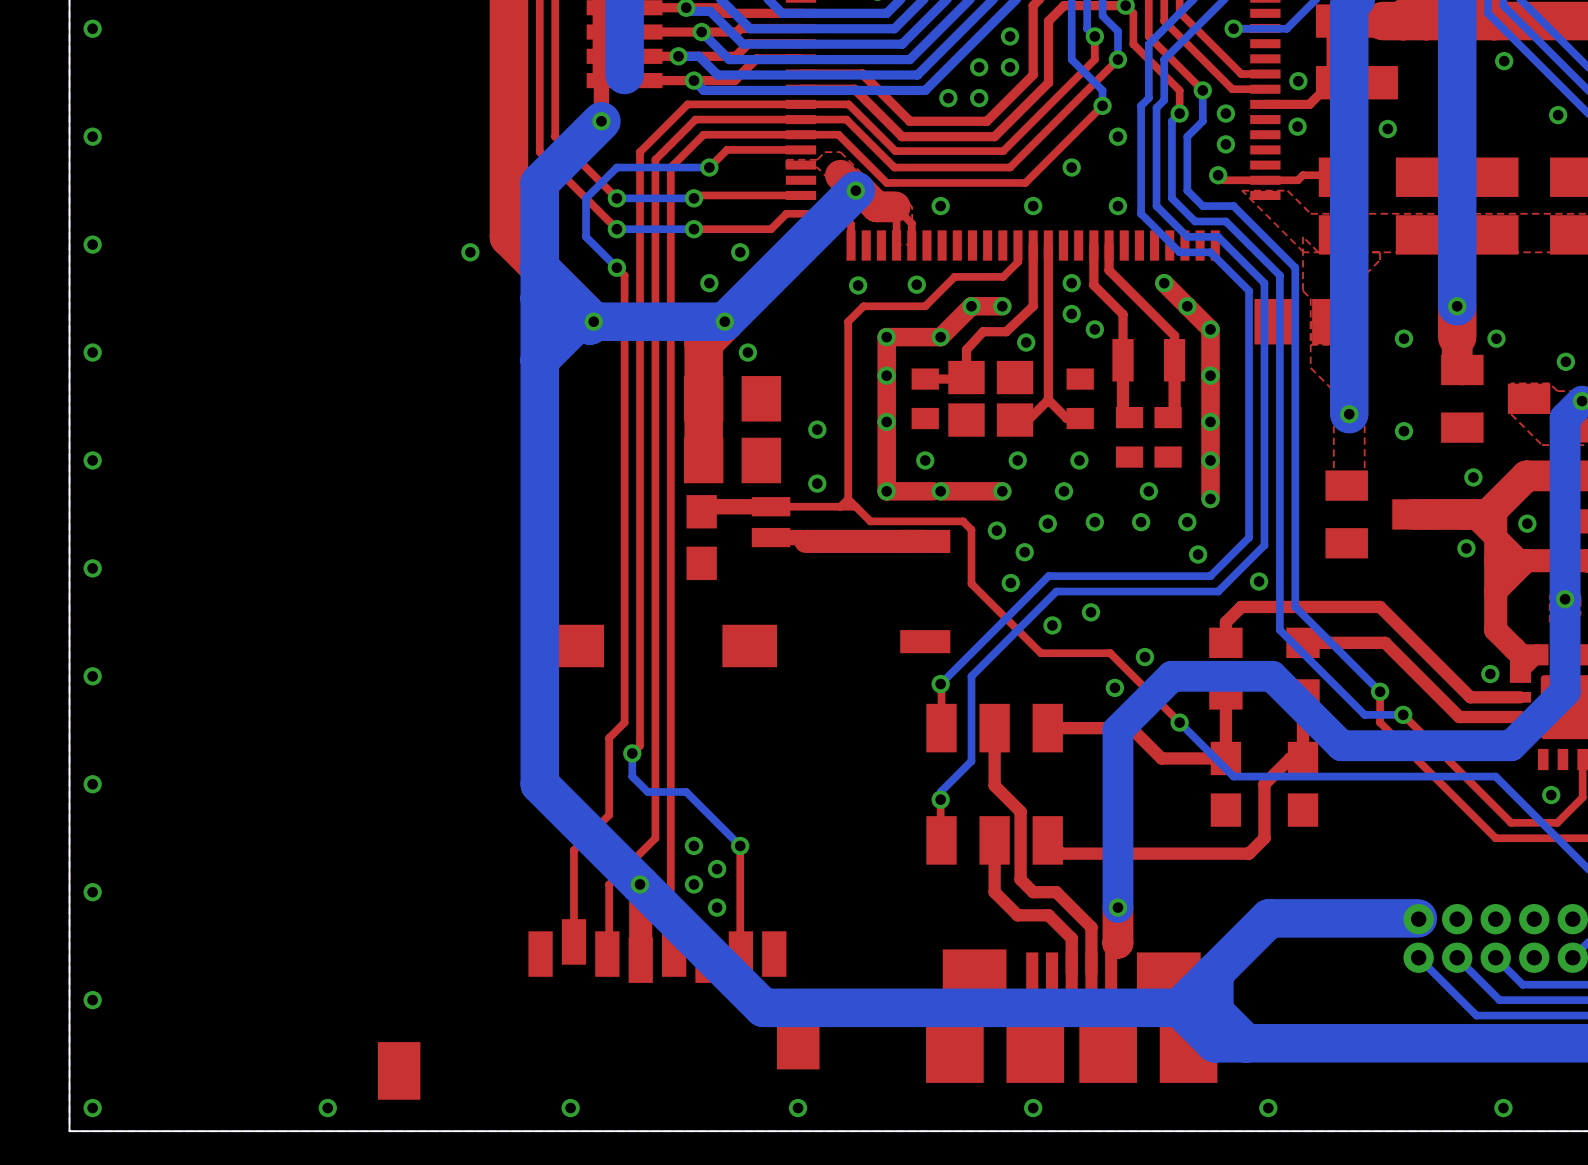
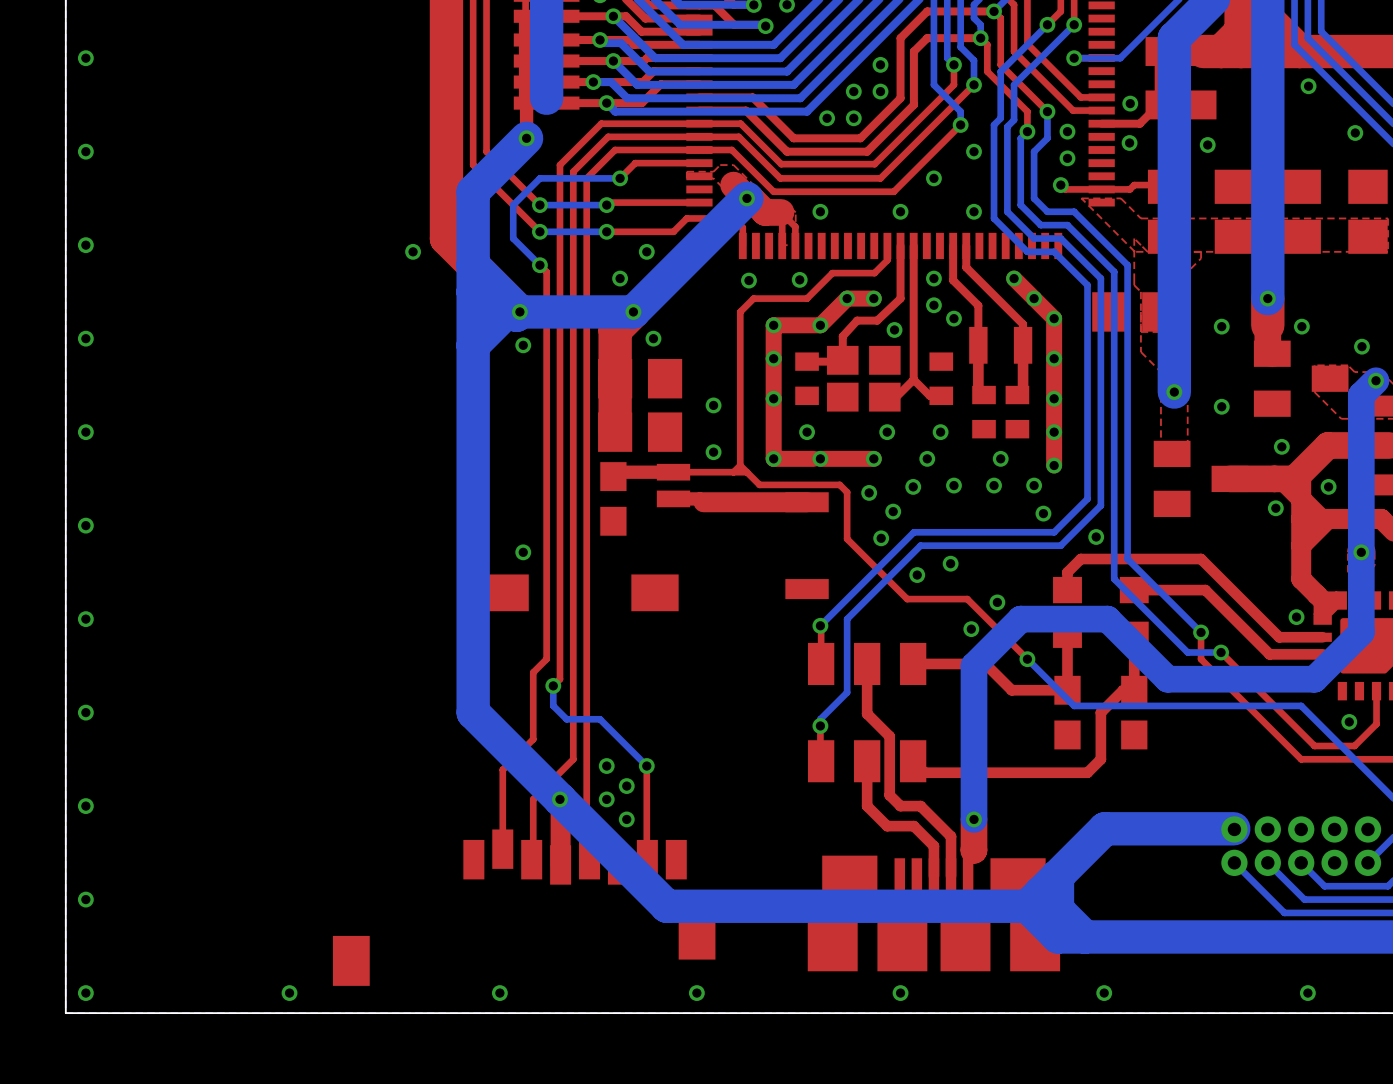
via: none -> (523, 345)
via: none -> (523, 552)

